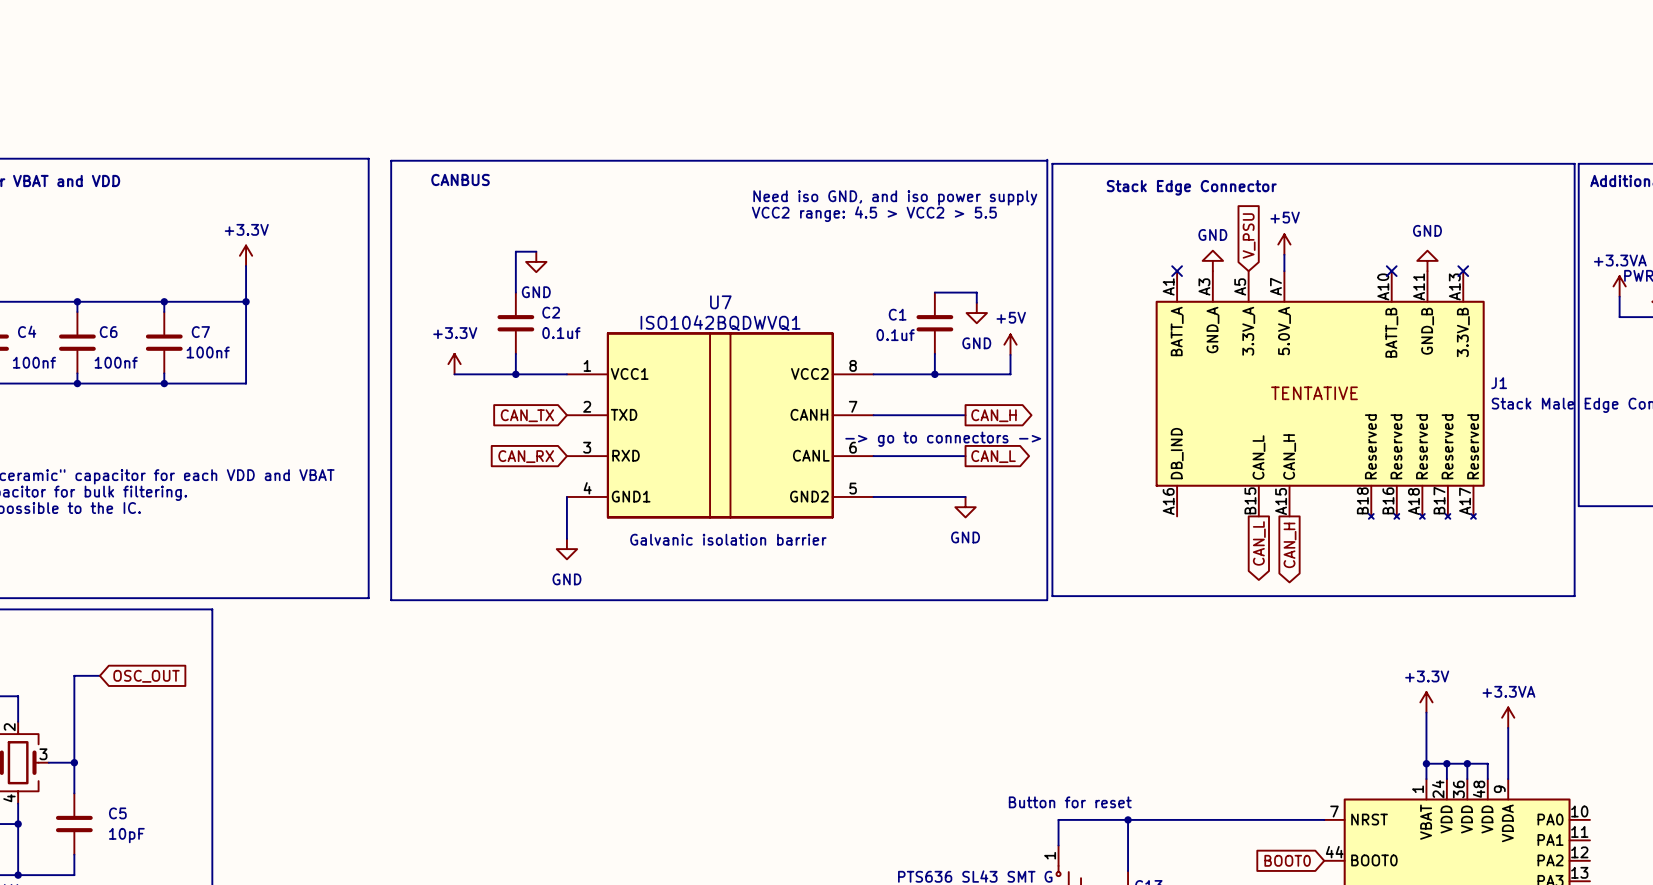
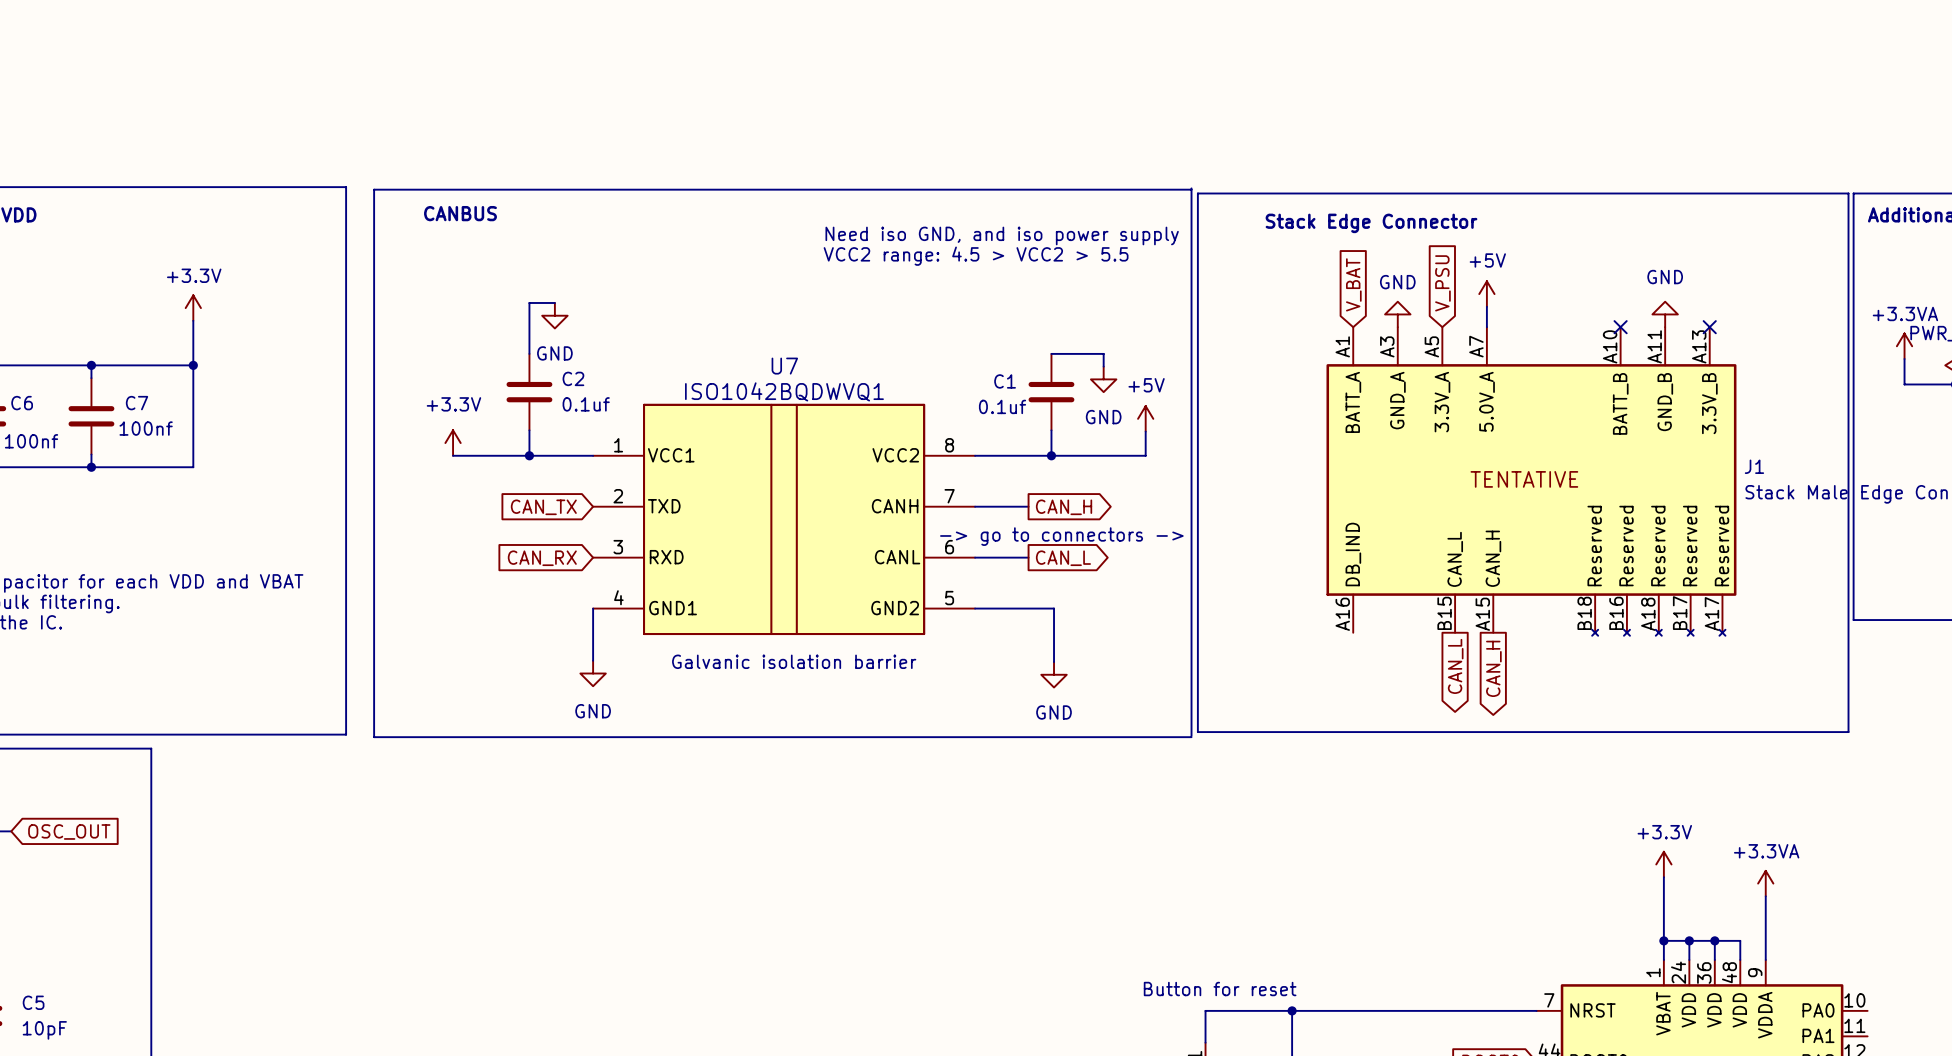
global label: none -> V_BAT (1353, 284)
no-connect mark: (1177, 271) -> none
wire: (916, 415) (965, 415) -> none
global label position: CAN_H (994, 415) -> CAN_H (1064, 507)
wire: (916, 456) (965, 456) -> none
global label position: CAN_L (993, 456) -> CAN_L (1063, 558)
wire: (936, 496) (965, 496) -> (1054, 608) (1054, 662)
power symbol position: GND (965, 507) -> GND (1054, 674)

